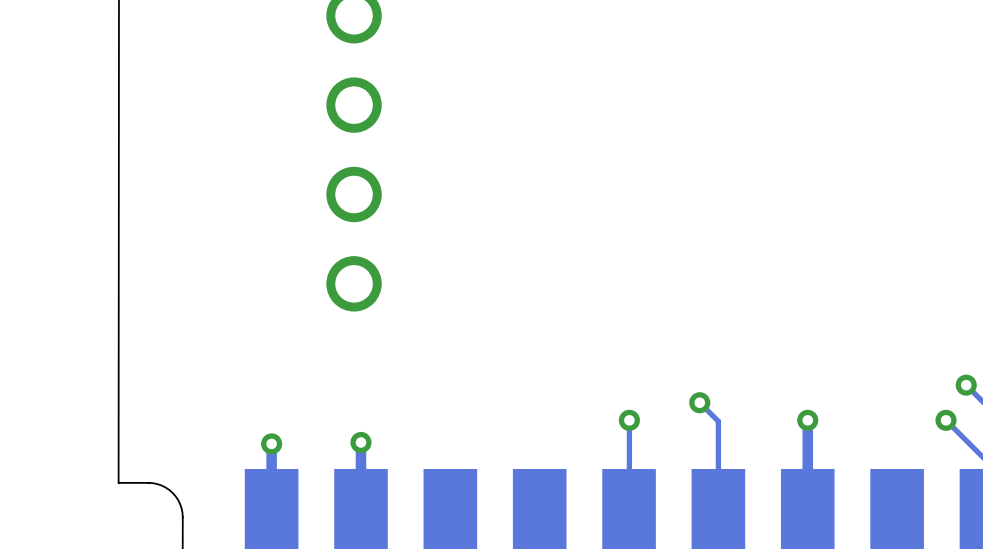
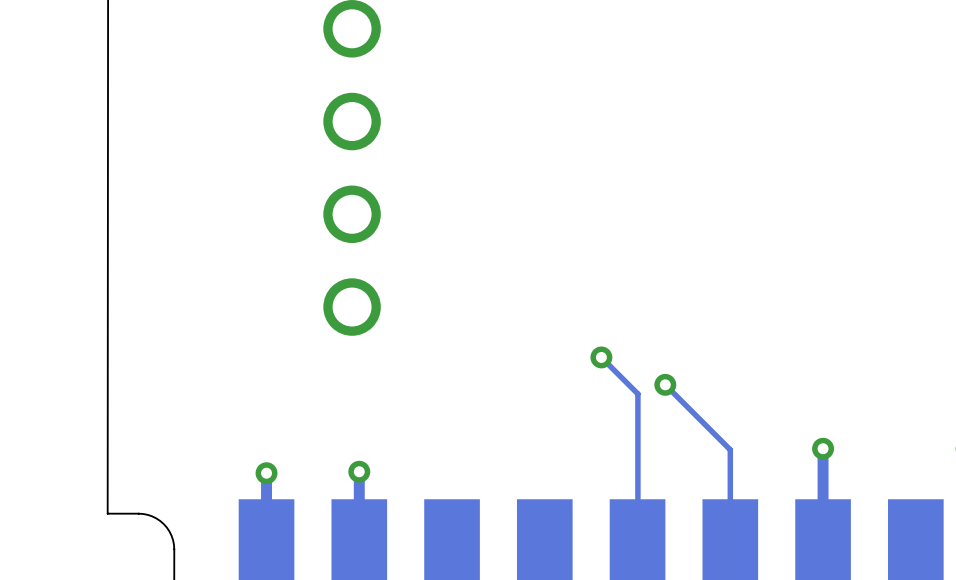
track: none -> (601, 357) (637, 393) (637, 448)
via: none -> (601, 357)
track: none -> (665, 384) (710, 430)
via: none -> (665, 384)
via: (699, 402) -> none
via: (629, 420) -> none

